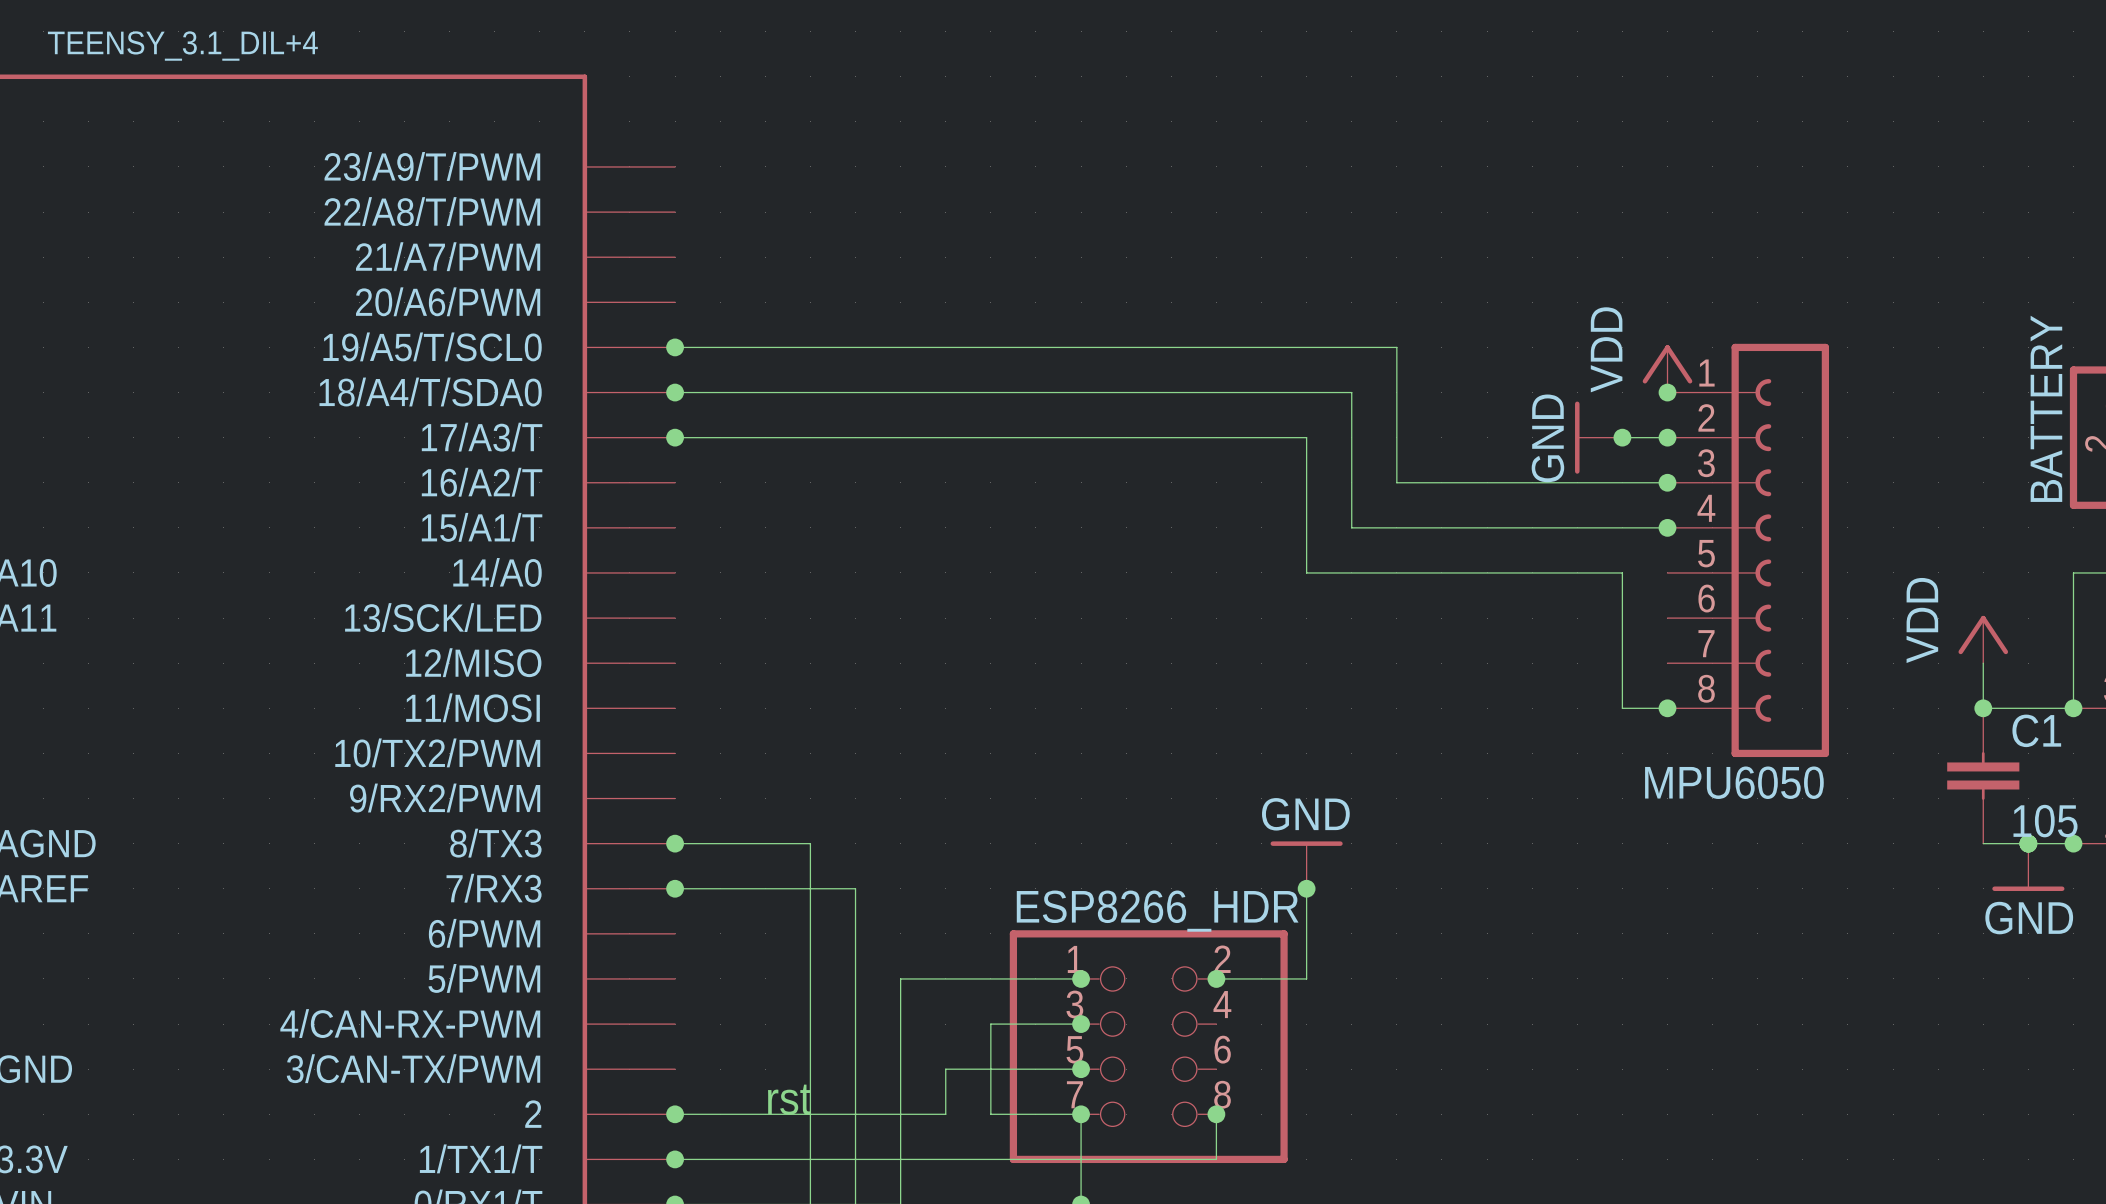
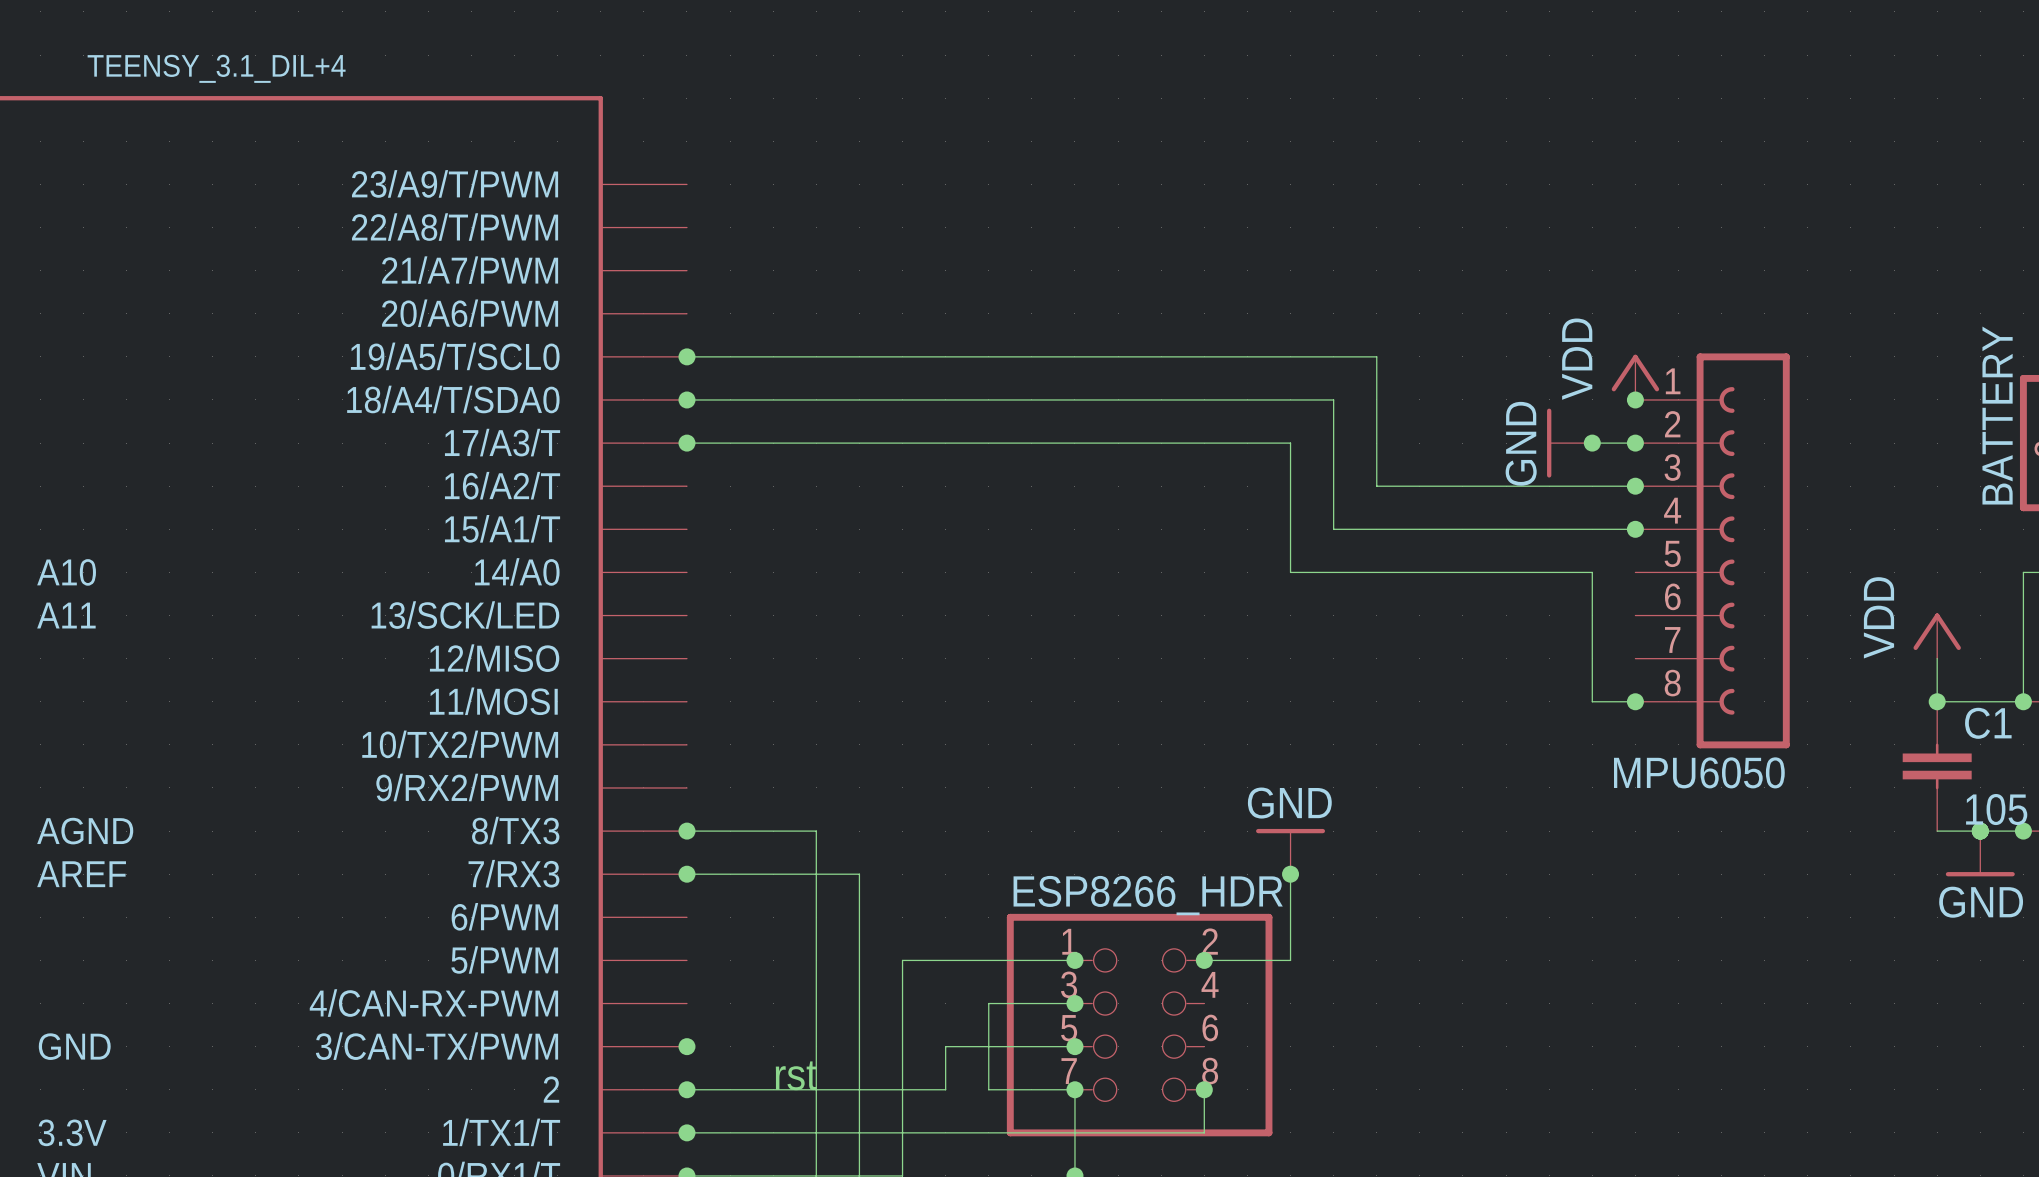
junction: none -> (686, 1046)

